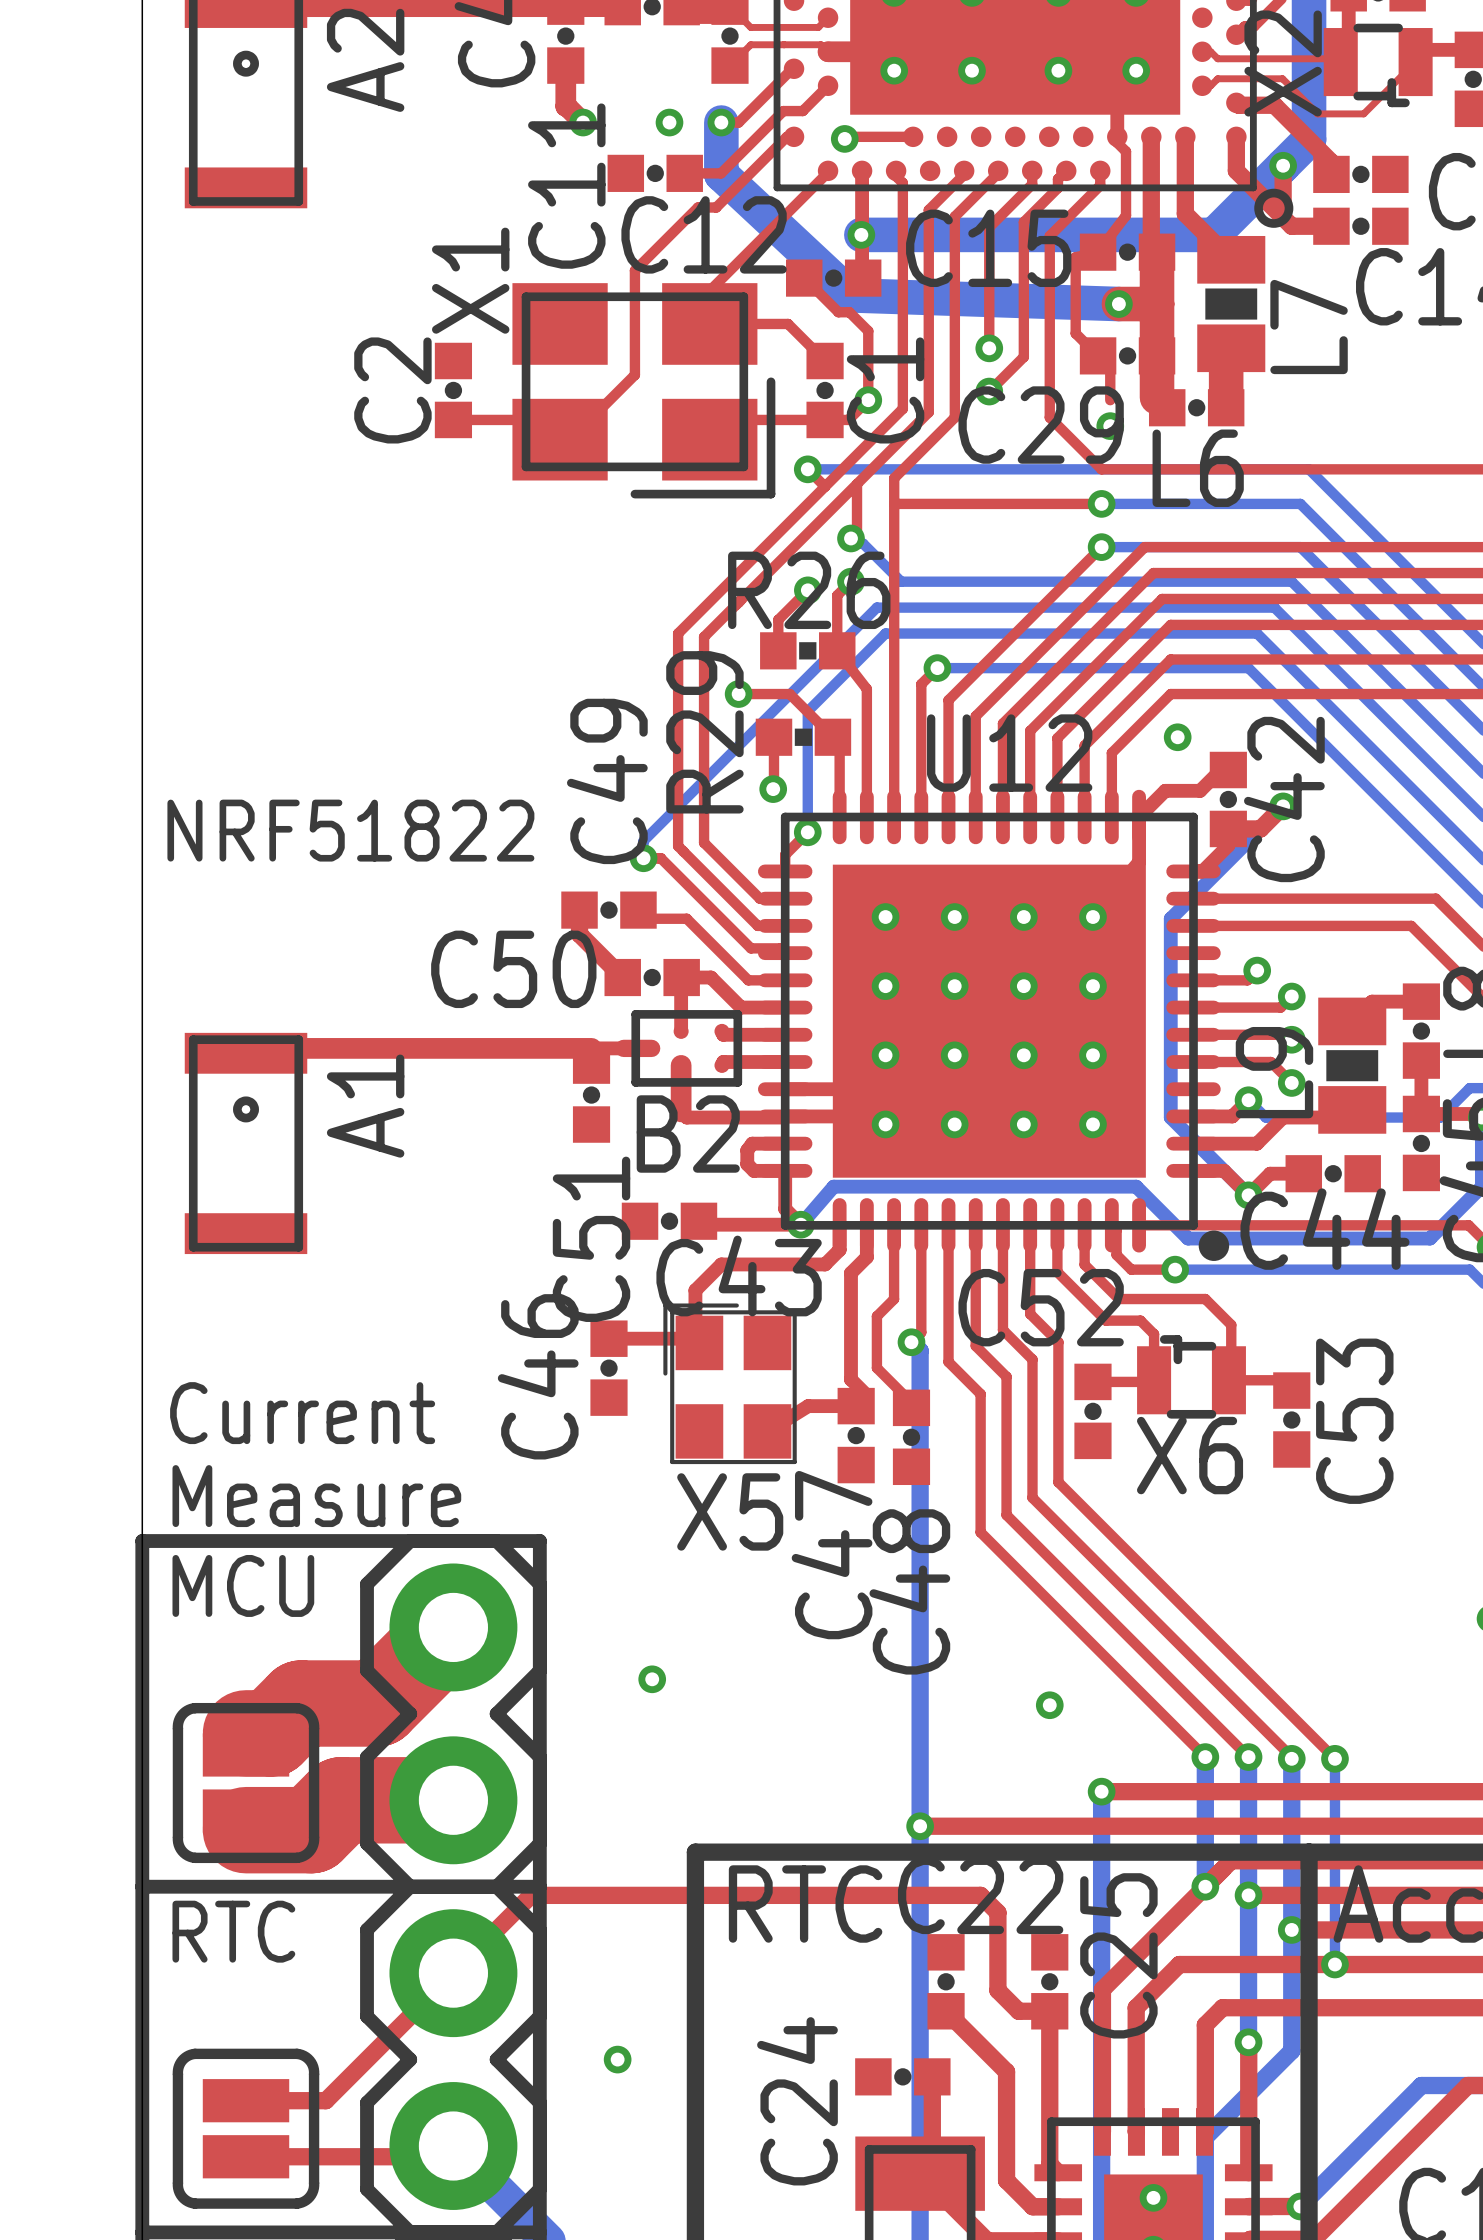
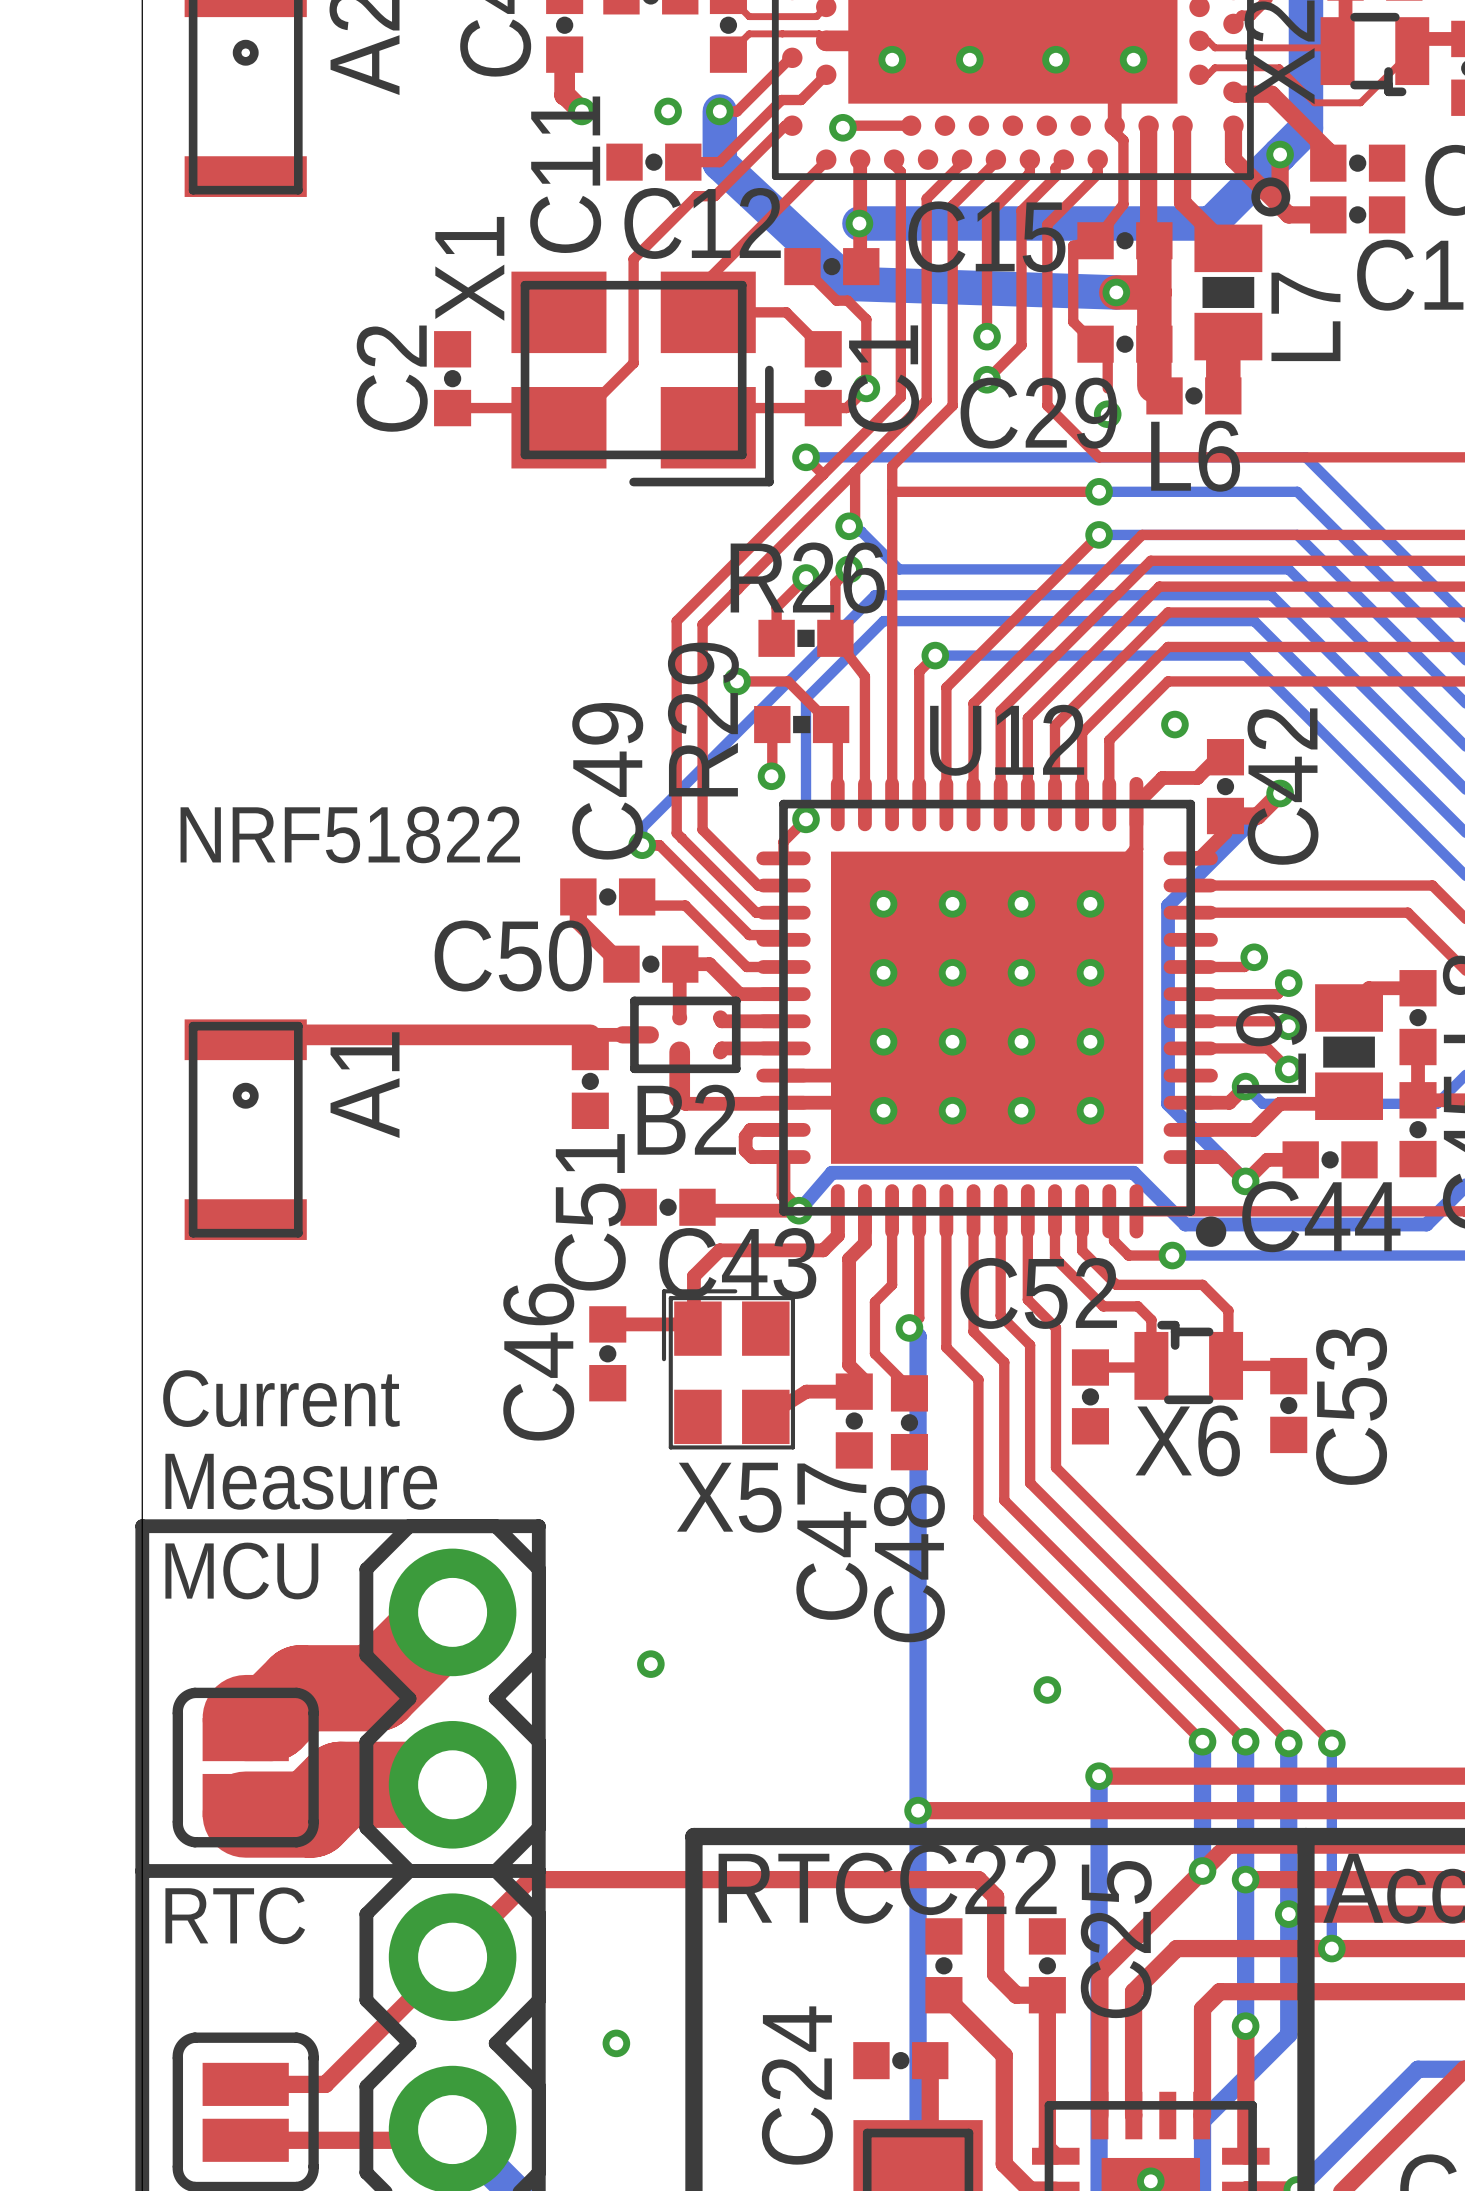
text position: NRF51822 (350, 830) -> NRF51822 (350, 834)

